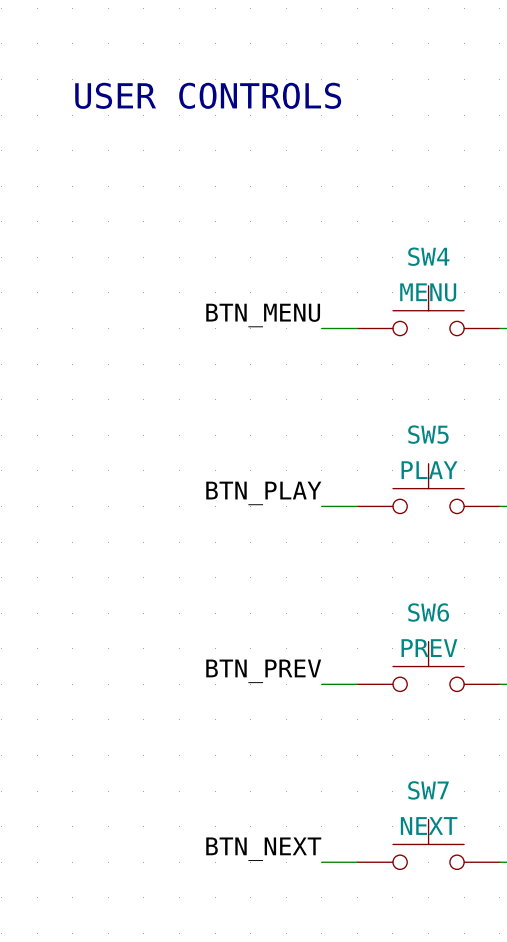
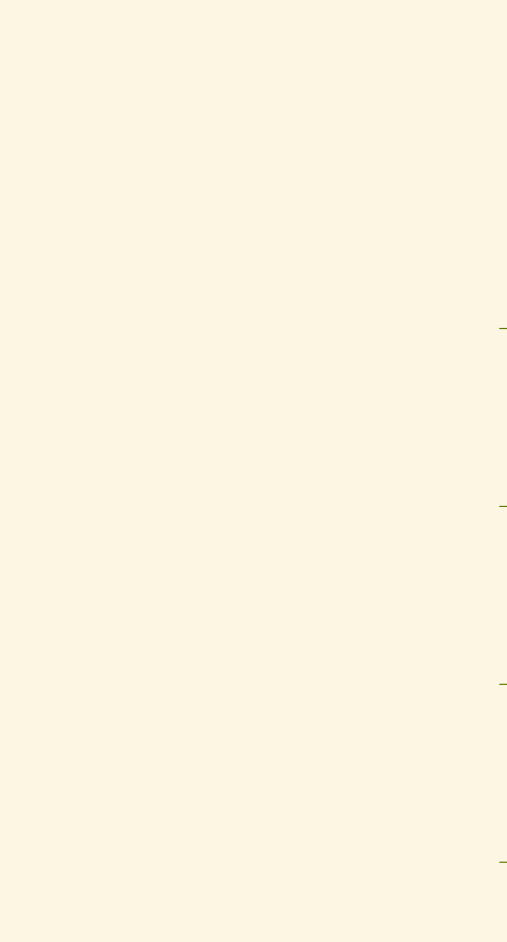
text: USER CONTROLS (208, 95) -> none
SW4: MENU (428, 310) -> none
label: BTN_MENU (263, 315) -> none
wire: (321, 328) (357, 328) -> none
SW5: PLAY (428, 488) -> none
label: BTN_PLAY (263, 493) -> none
wire: (321, 506) (357, 506) -> none
SW6: PREV (428, 666) -> none
label: BTN_PREV (263, 671) -> none
wire: (321, 684) (357, 684) -> none
SW7: NEXT (428, 844) -> none
label: BTN_NEXT (263, 849) -> none
wire: (321, 862) (357, 862) -> none

